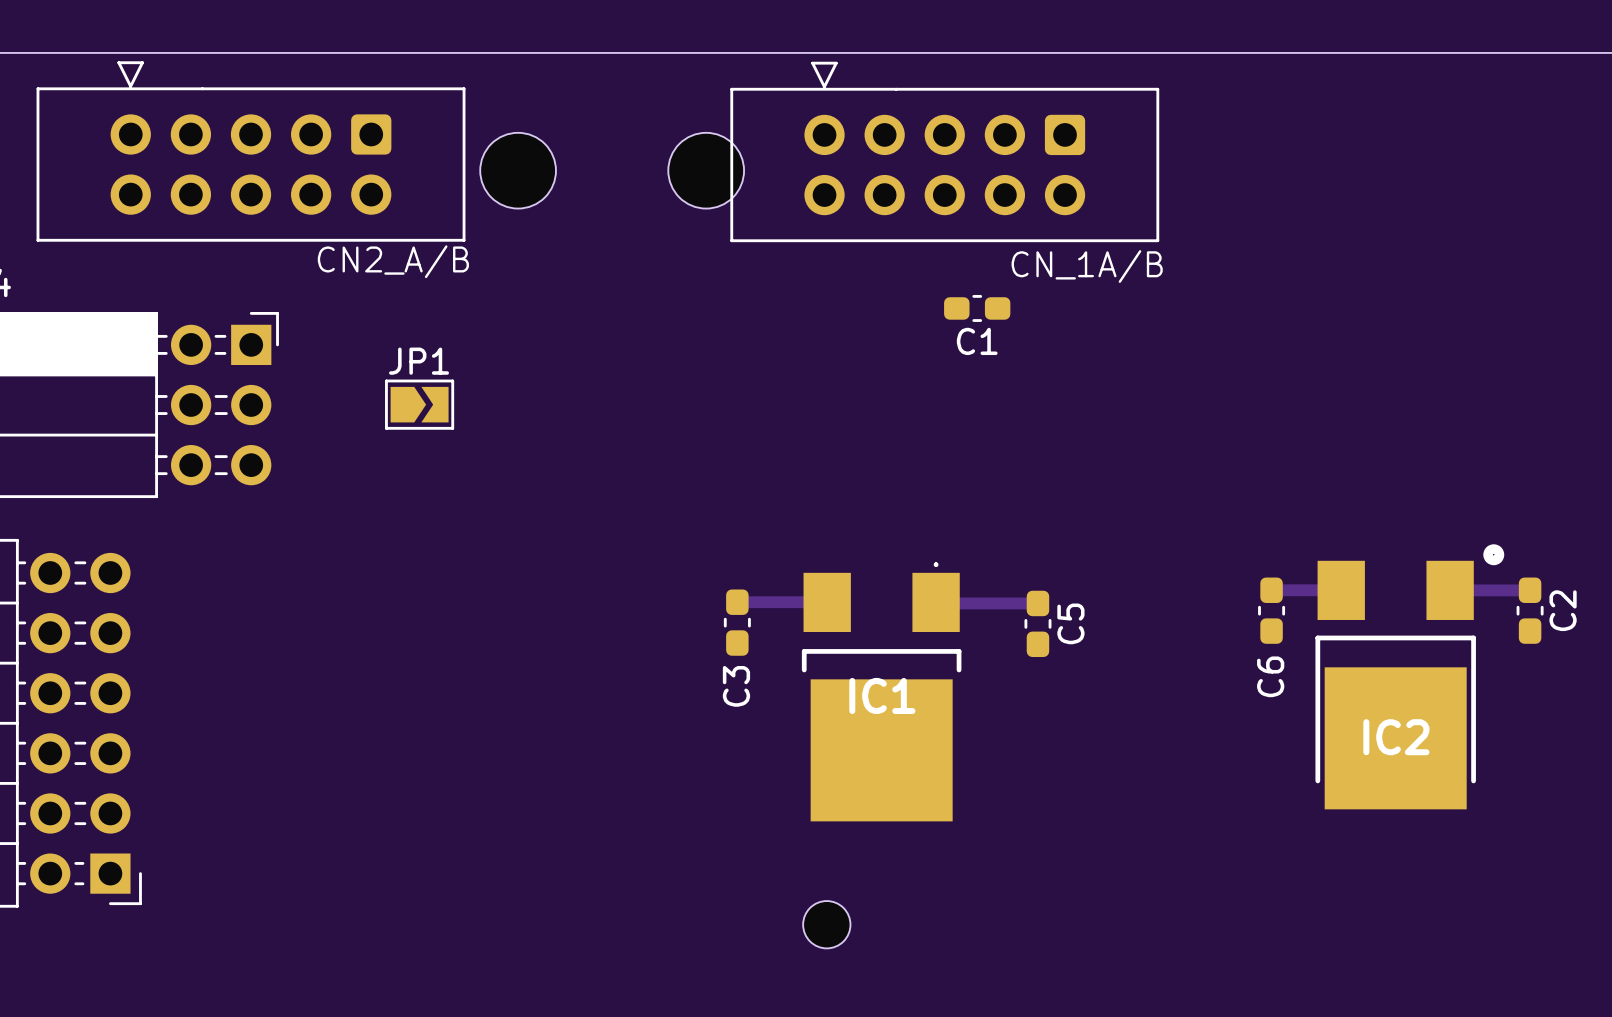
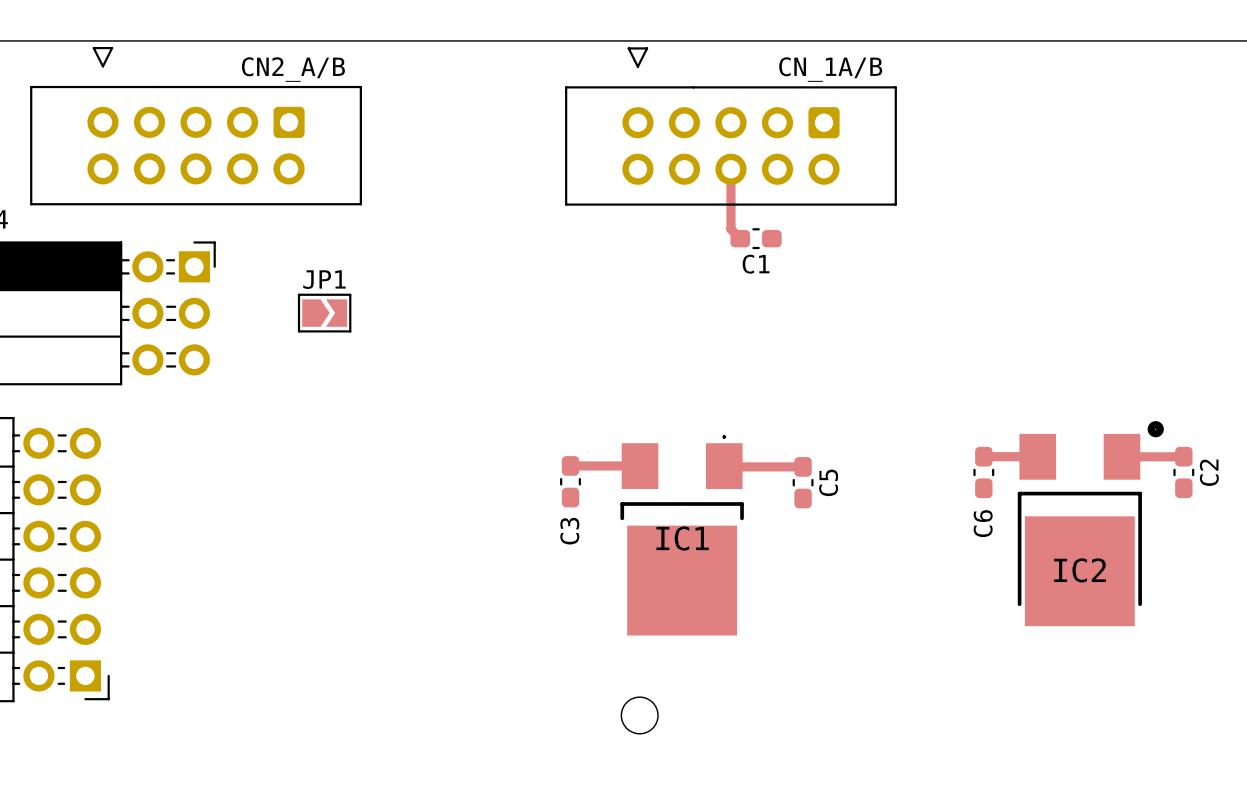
part footprint: [36, 61, 466, 242] -> [30, 46, 362, 206]
part footprint: [730, 61, 1160, 243] -> [565, 47, 897, 206]
part: (518, 170) -> none
part: (706, 170) -> none
track: none -> (730, 169) (730, 229) (740, 238)

